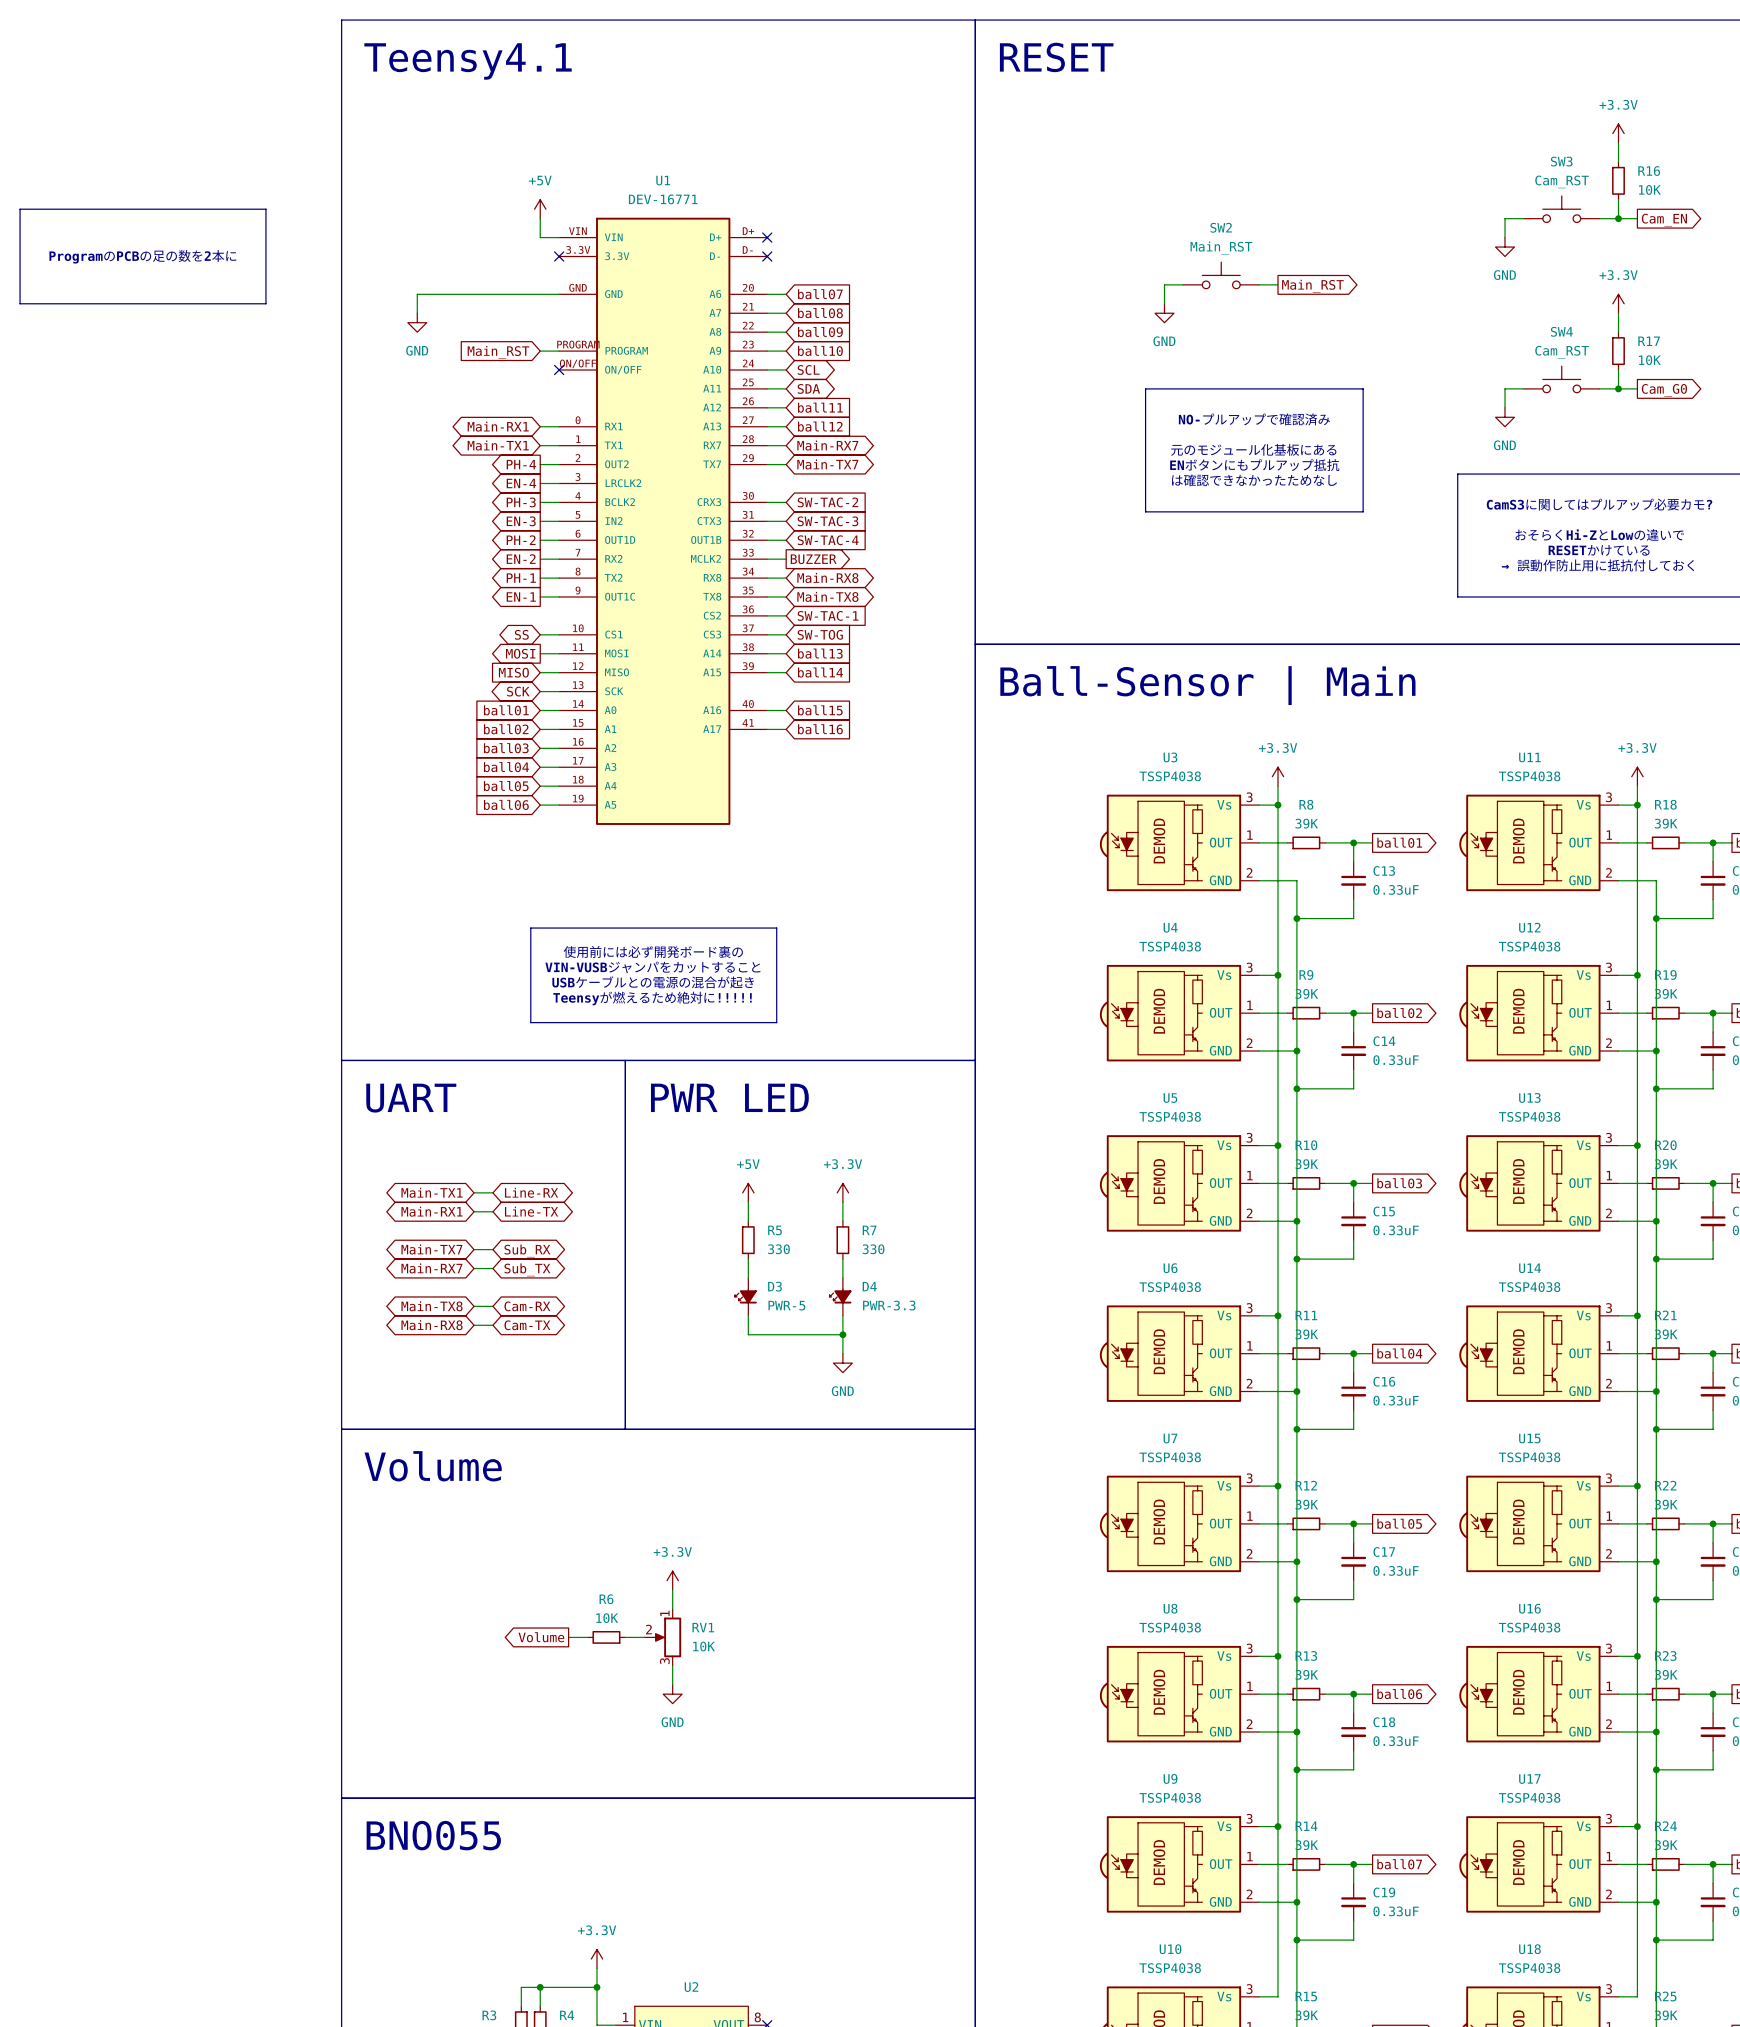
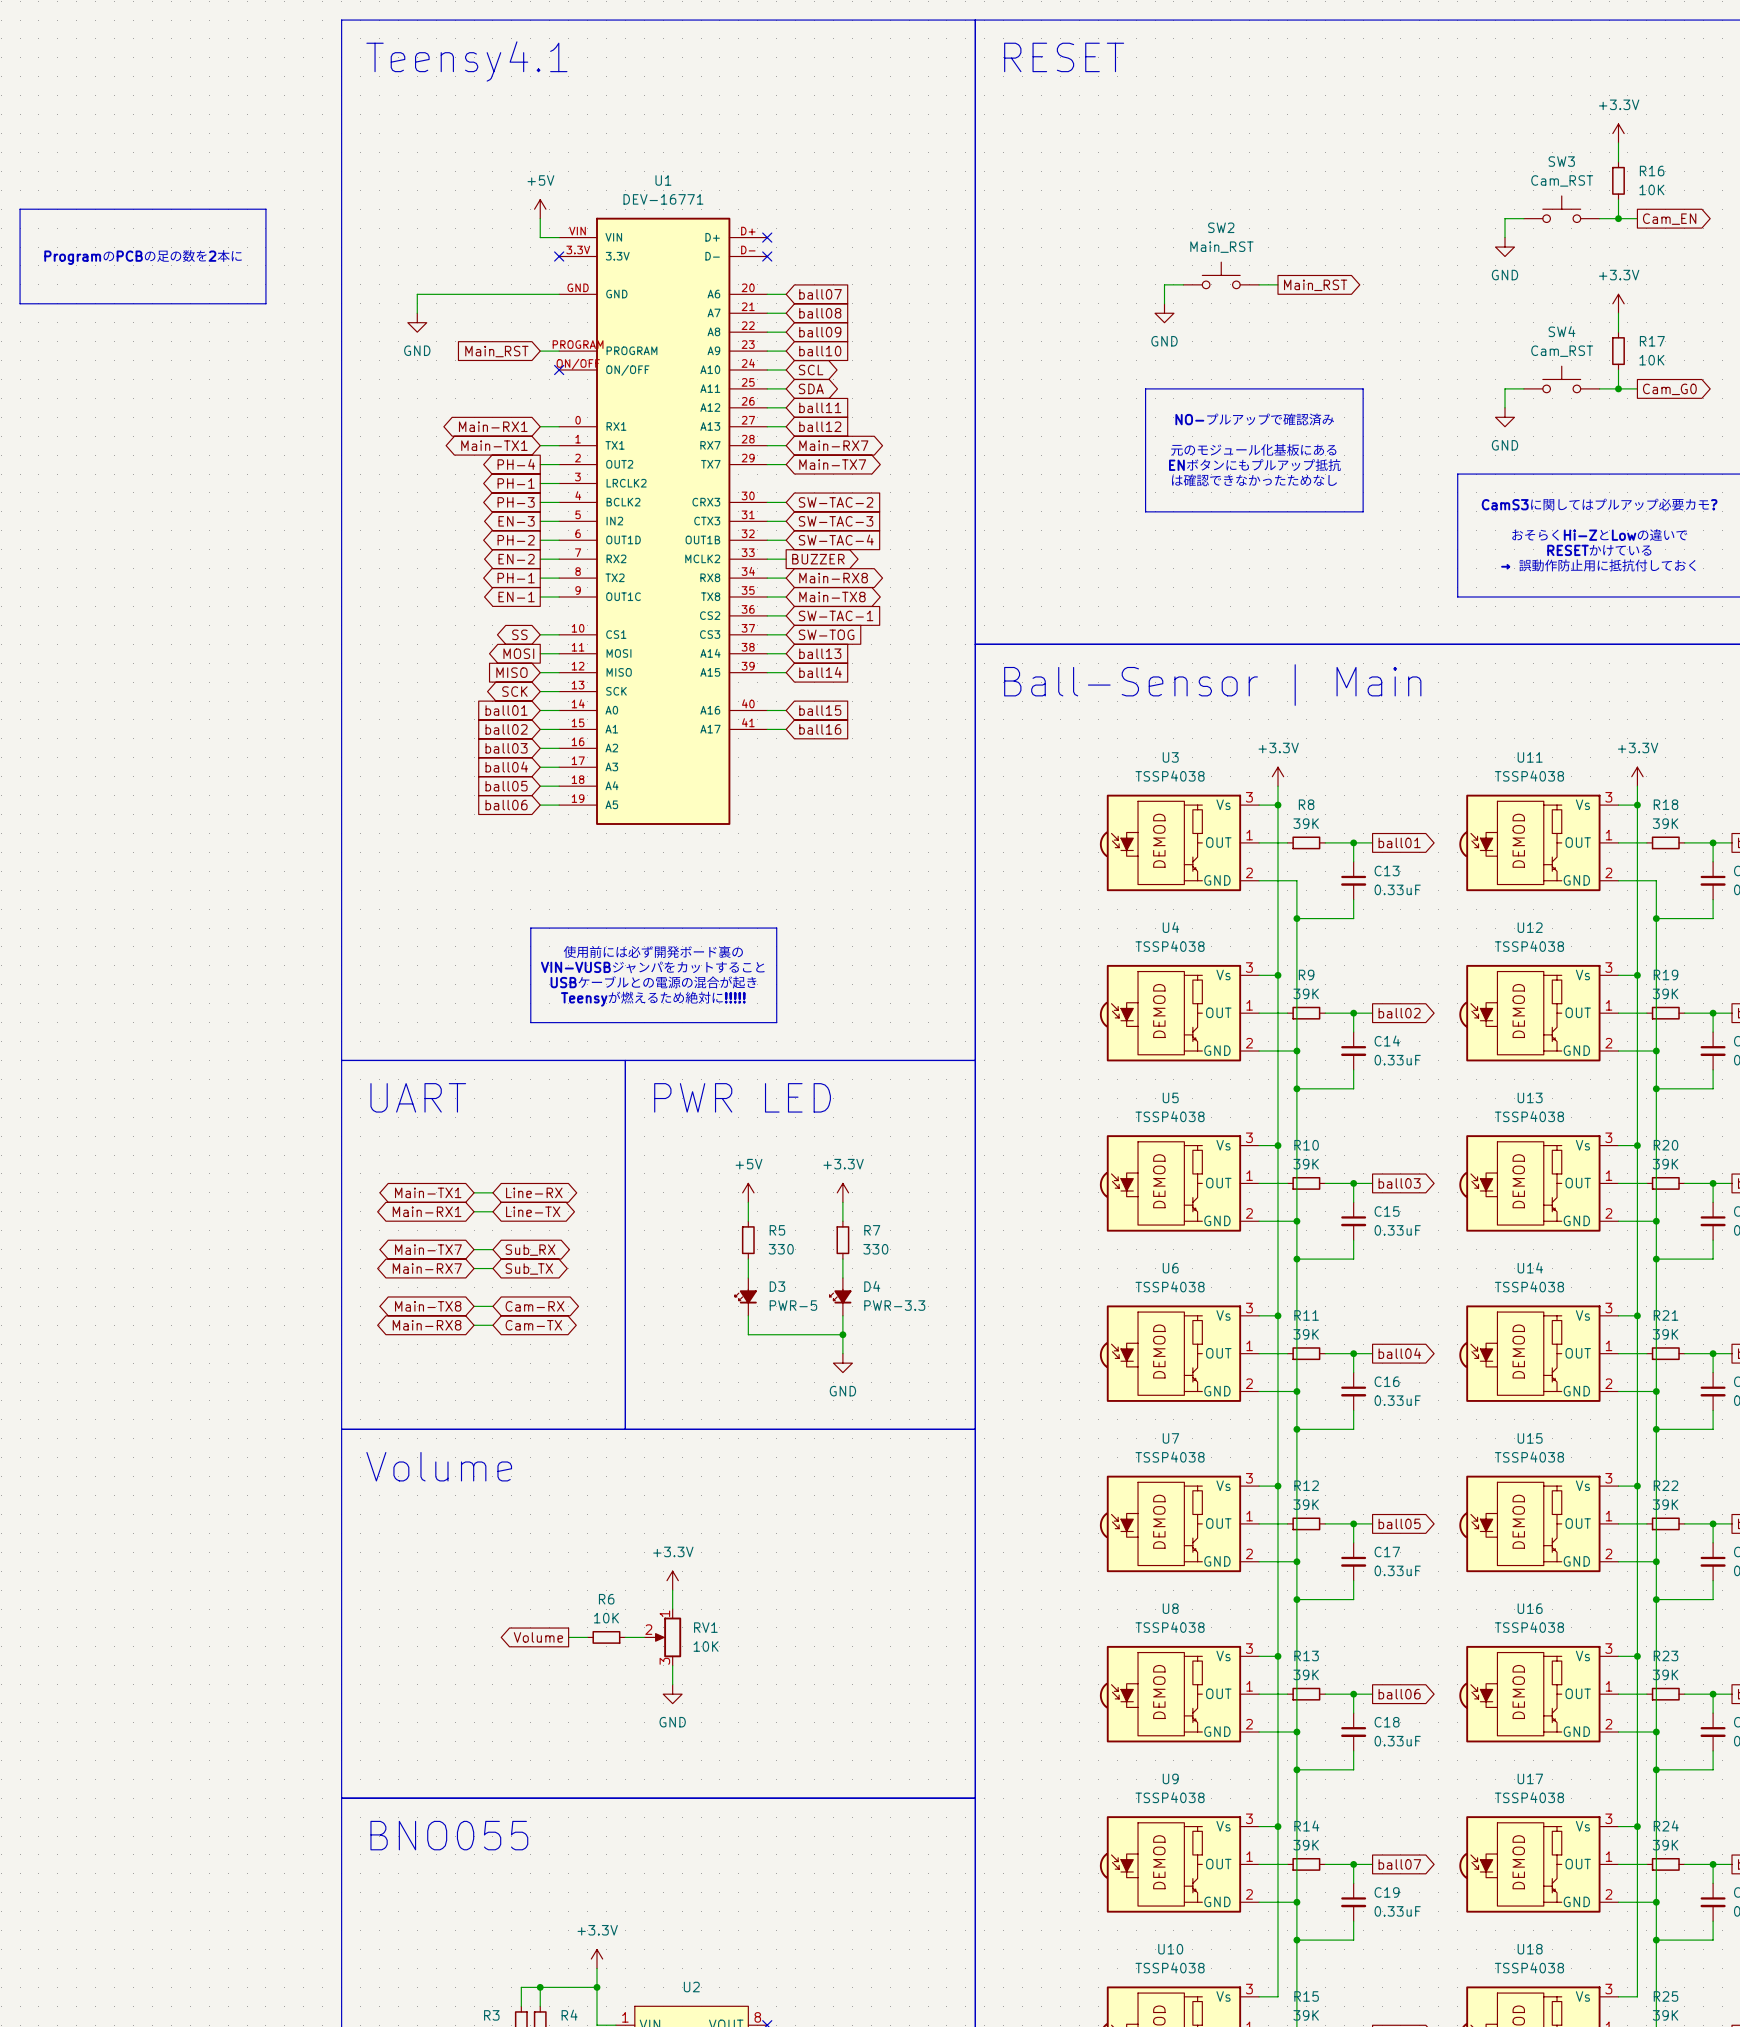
global label: EN-4 (521, 483) -> PH-1 (516, 483)

